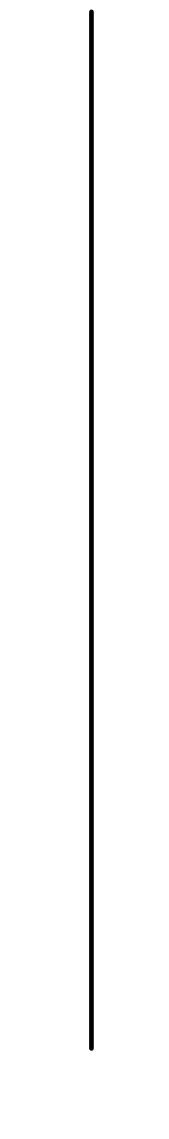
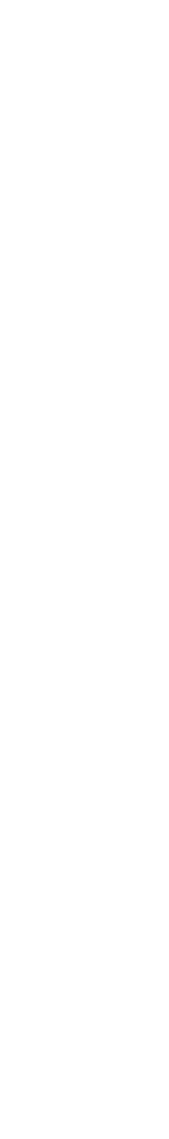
line: (91, 11) (91, 1048) -> none

